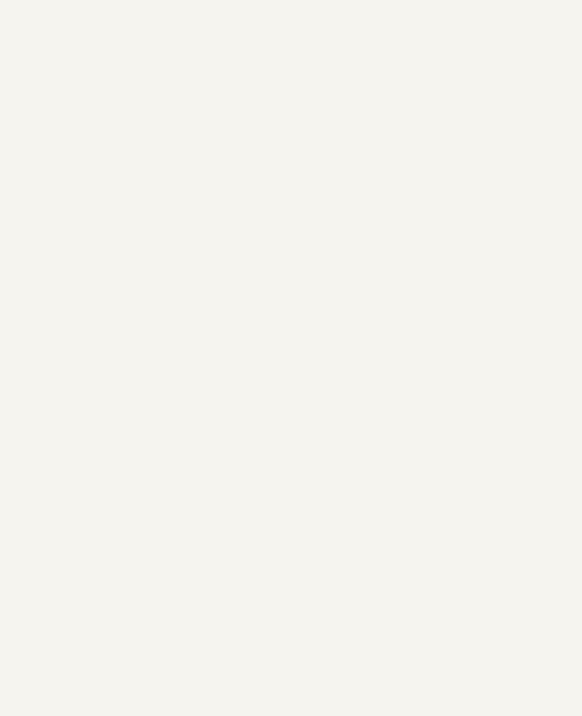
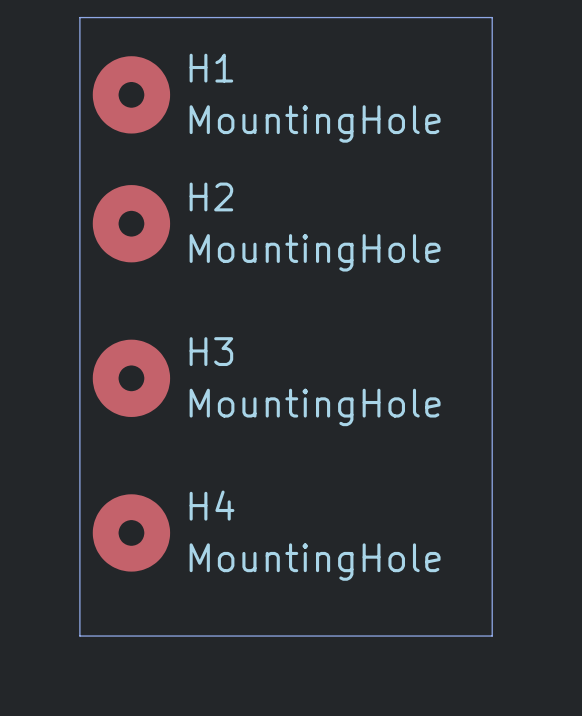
line: none -> (79, 17) (492, 17) (492, 636) (79, 636) (79, 17)
H1: none -> MountingHole (131, 94)
H2: none -> MountingHole (131, 223)
H3: none -> MountingHole (131, 378)
H4: none -> MountingHole (131, 532)

